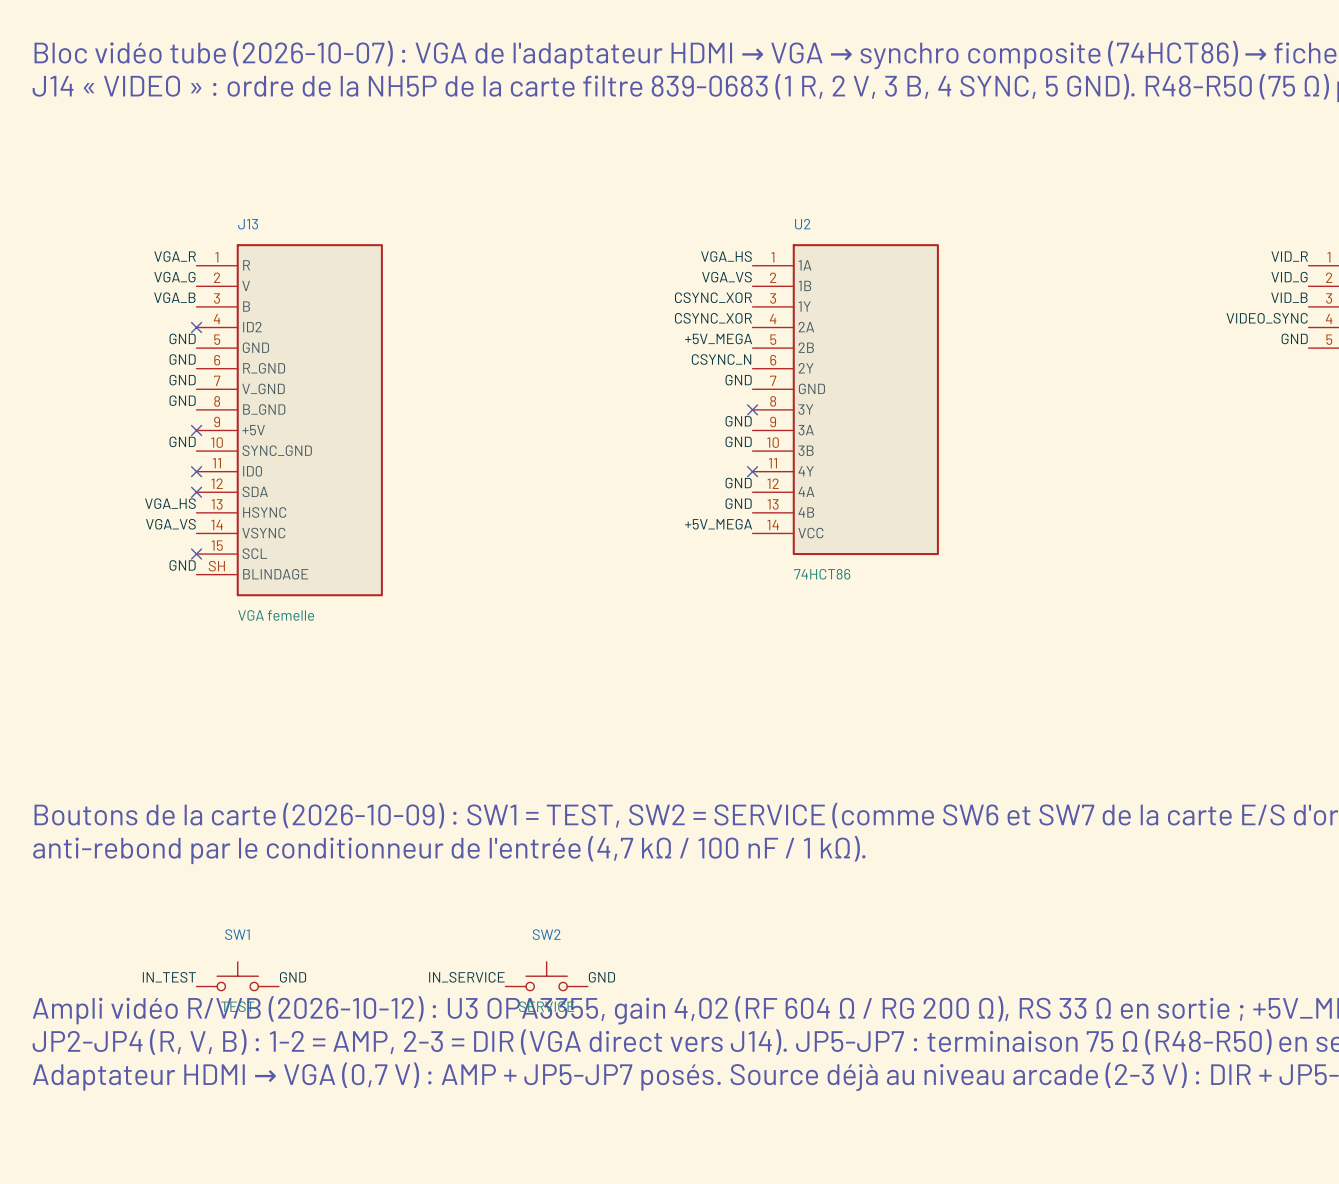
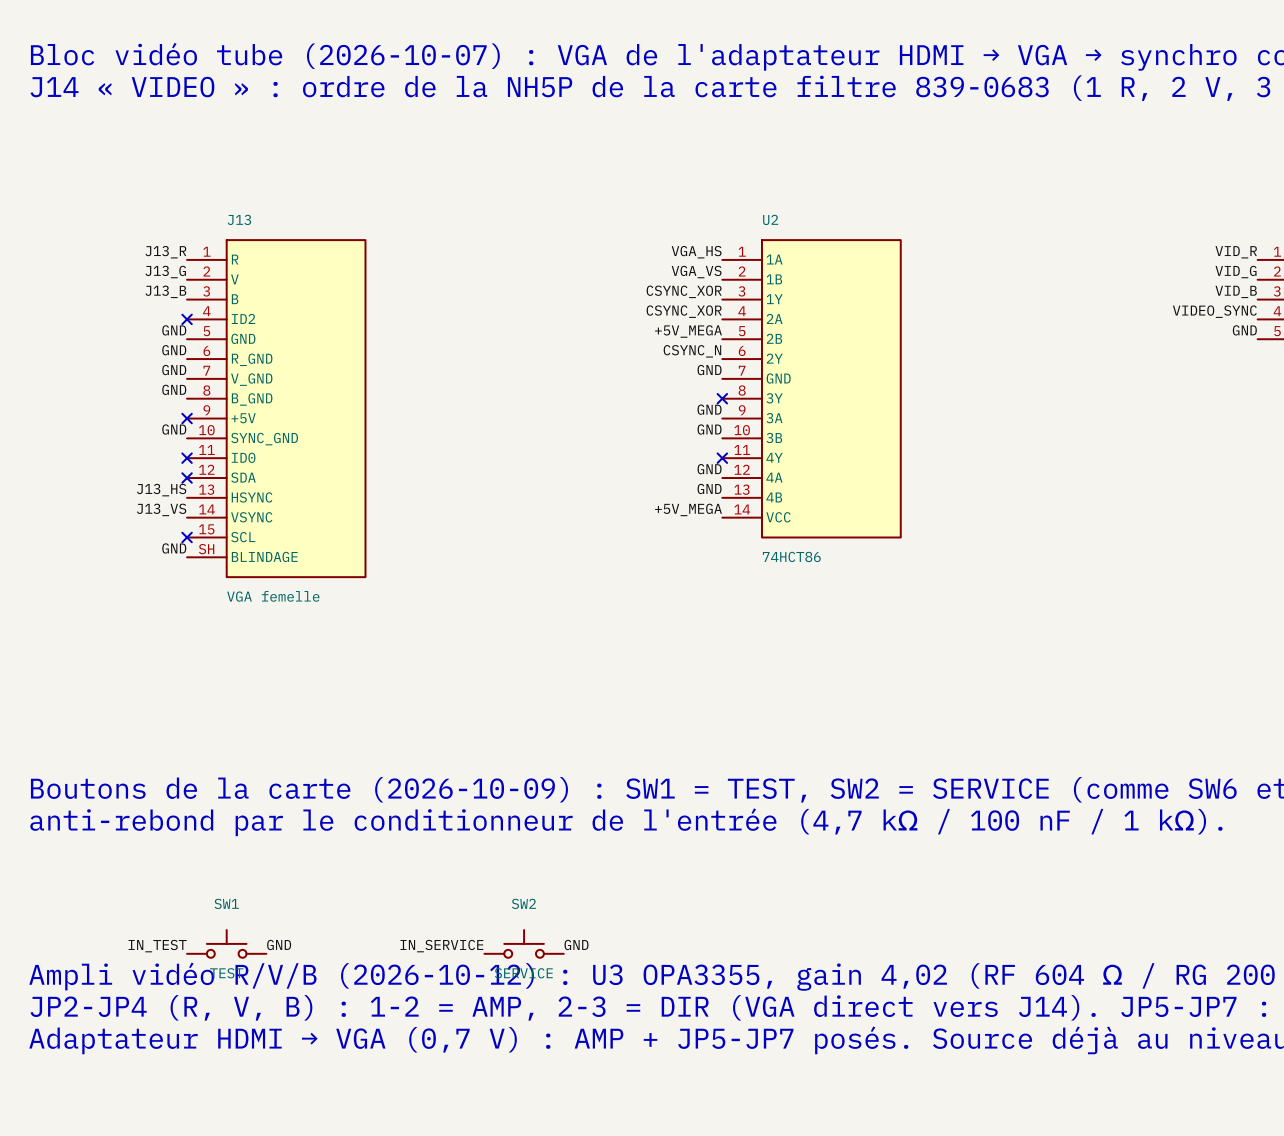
label: VGA_R (175, 256) -> J13_R (165, 252)
label: VGA_G (174, 277) -> J13_G (165, 272)
label: VGA_B (174, 297) -> J13_B (165, 291)
label: VGA_HS (170, 503) -> J13_HS (161, 490)
label: VGA_VS (170, 524) -> J13_VS (161, 509)

